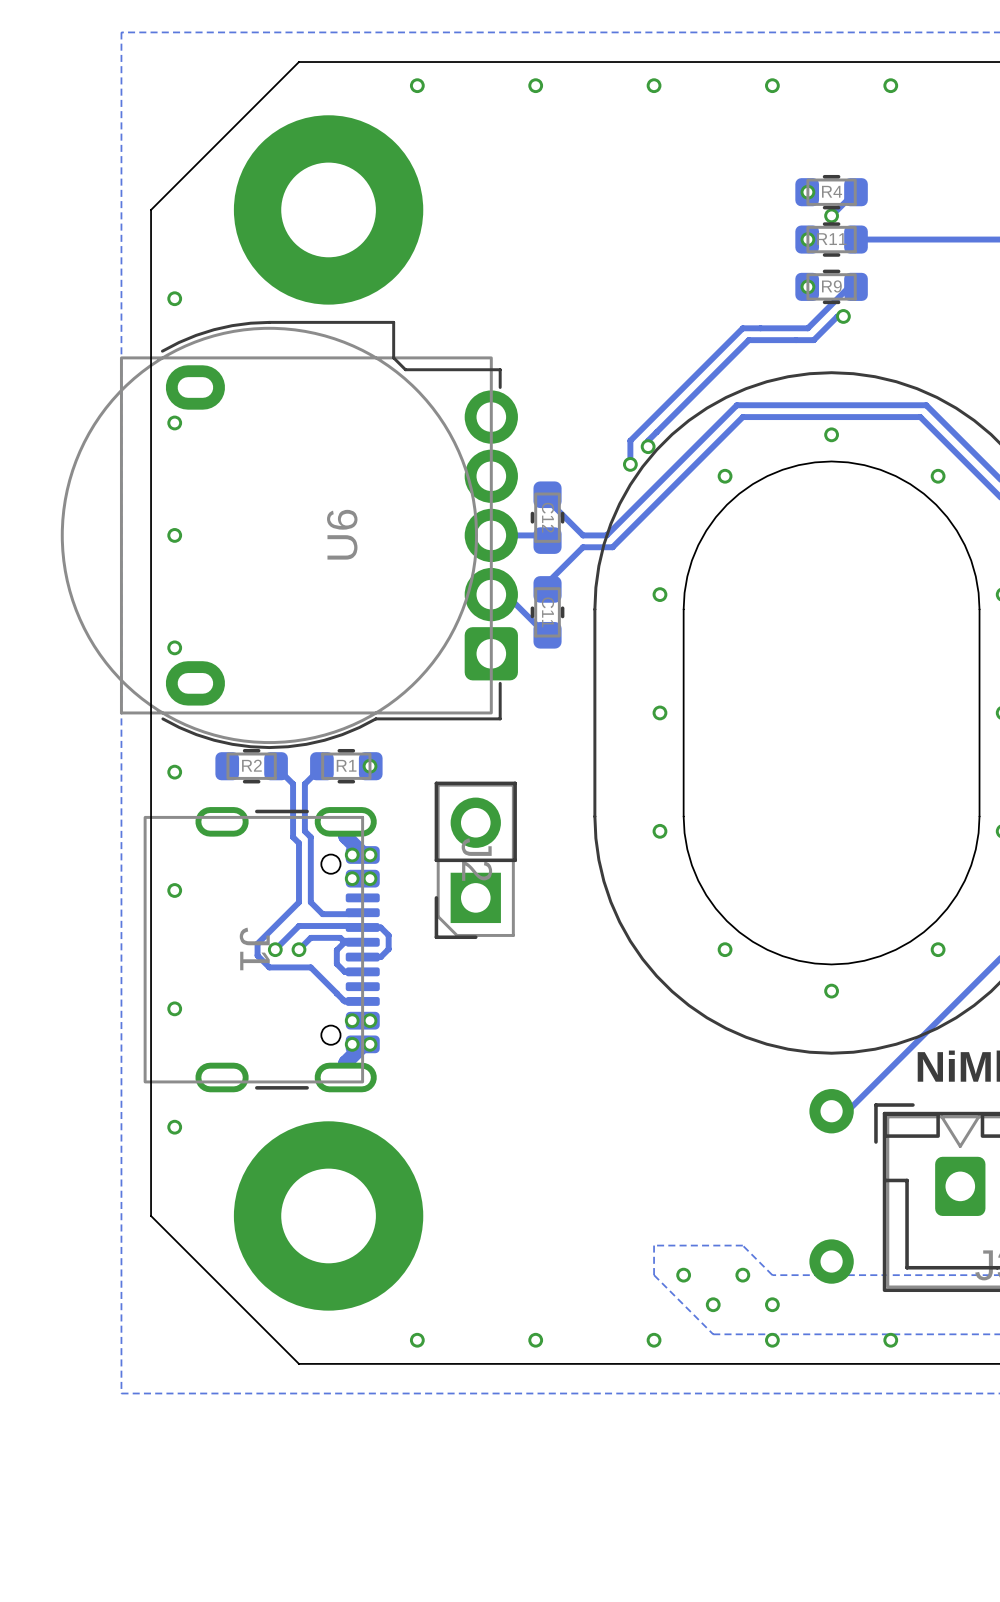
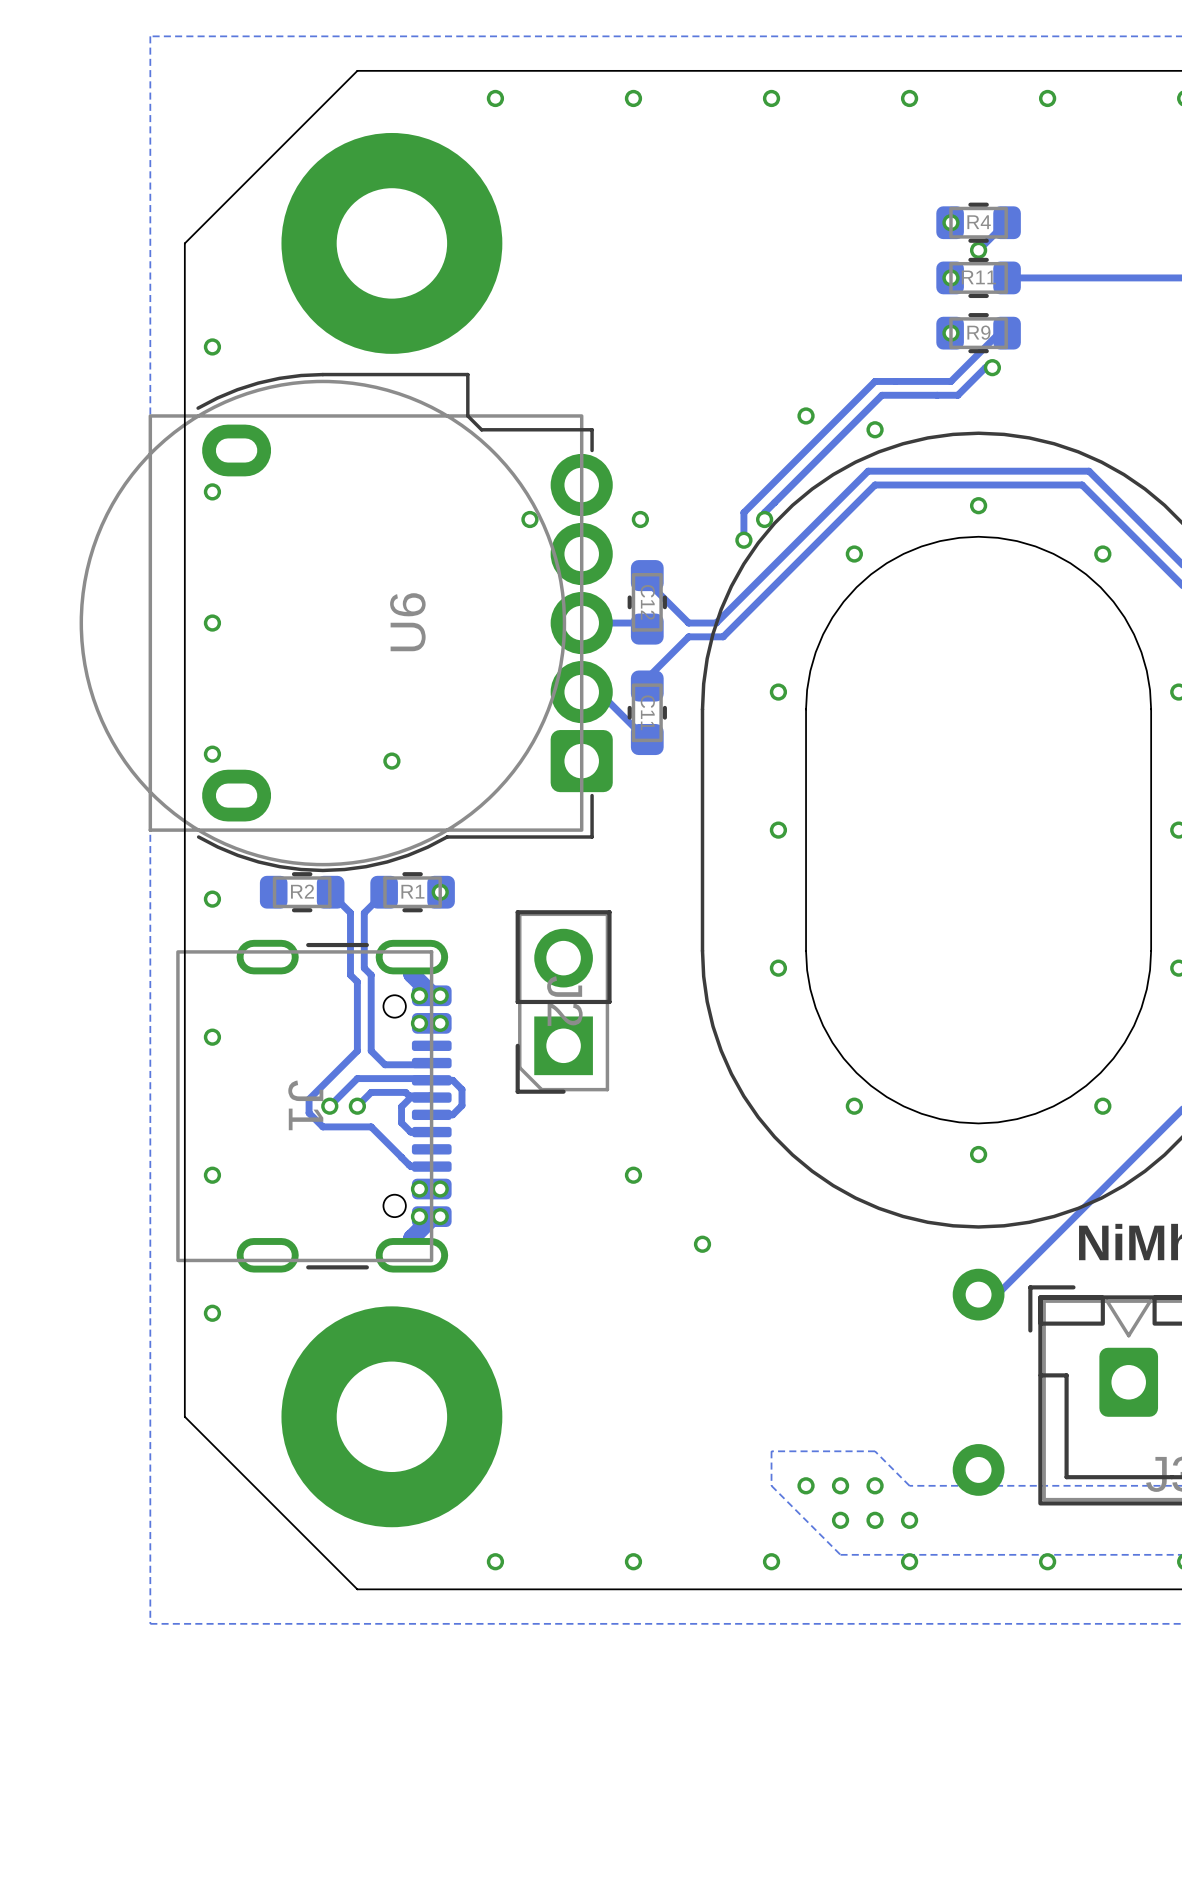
via: none -> (806, 415)
via: none -> (875, 429)
via: none -> (529, 519)
via: none -> (640, 519)
via: none -> (391, 761)
via: none -> (633, 1175)
via: none -> (702, 1244)
via: none -> (840, 1485)
via: none -> (875, 1520)

